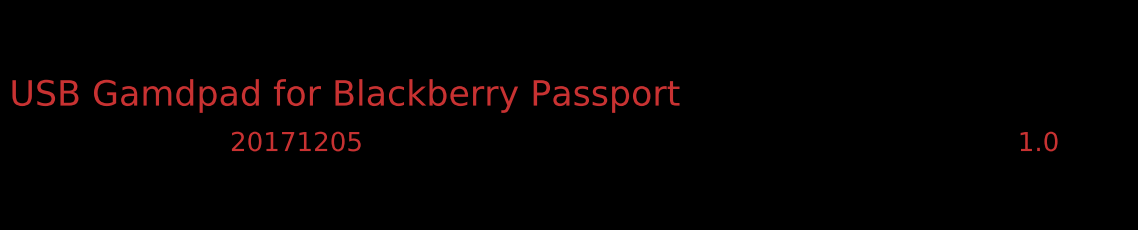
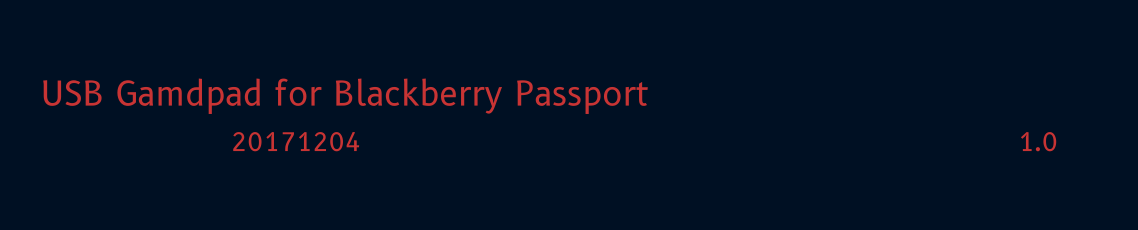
text: 20171205 (296, 141) -> 20171204 (296, 141)

